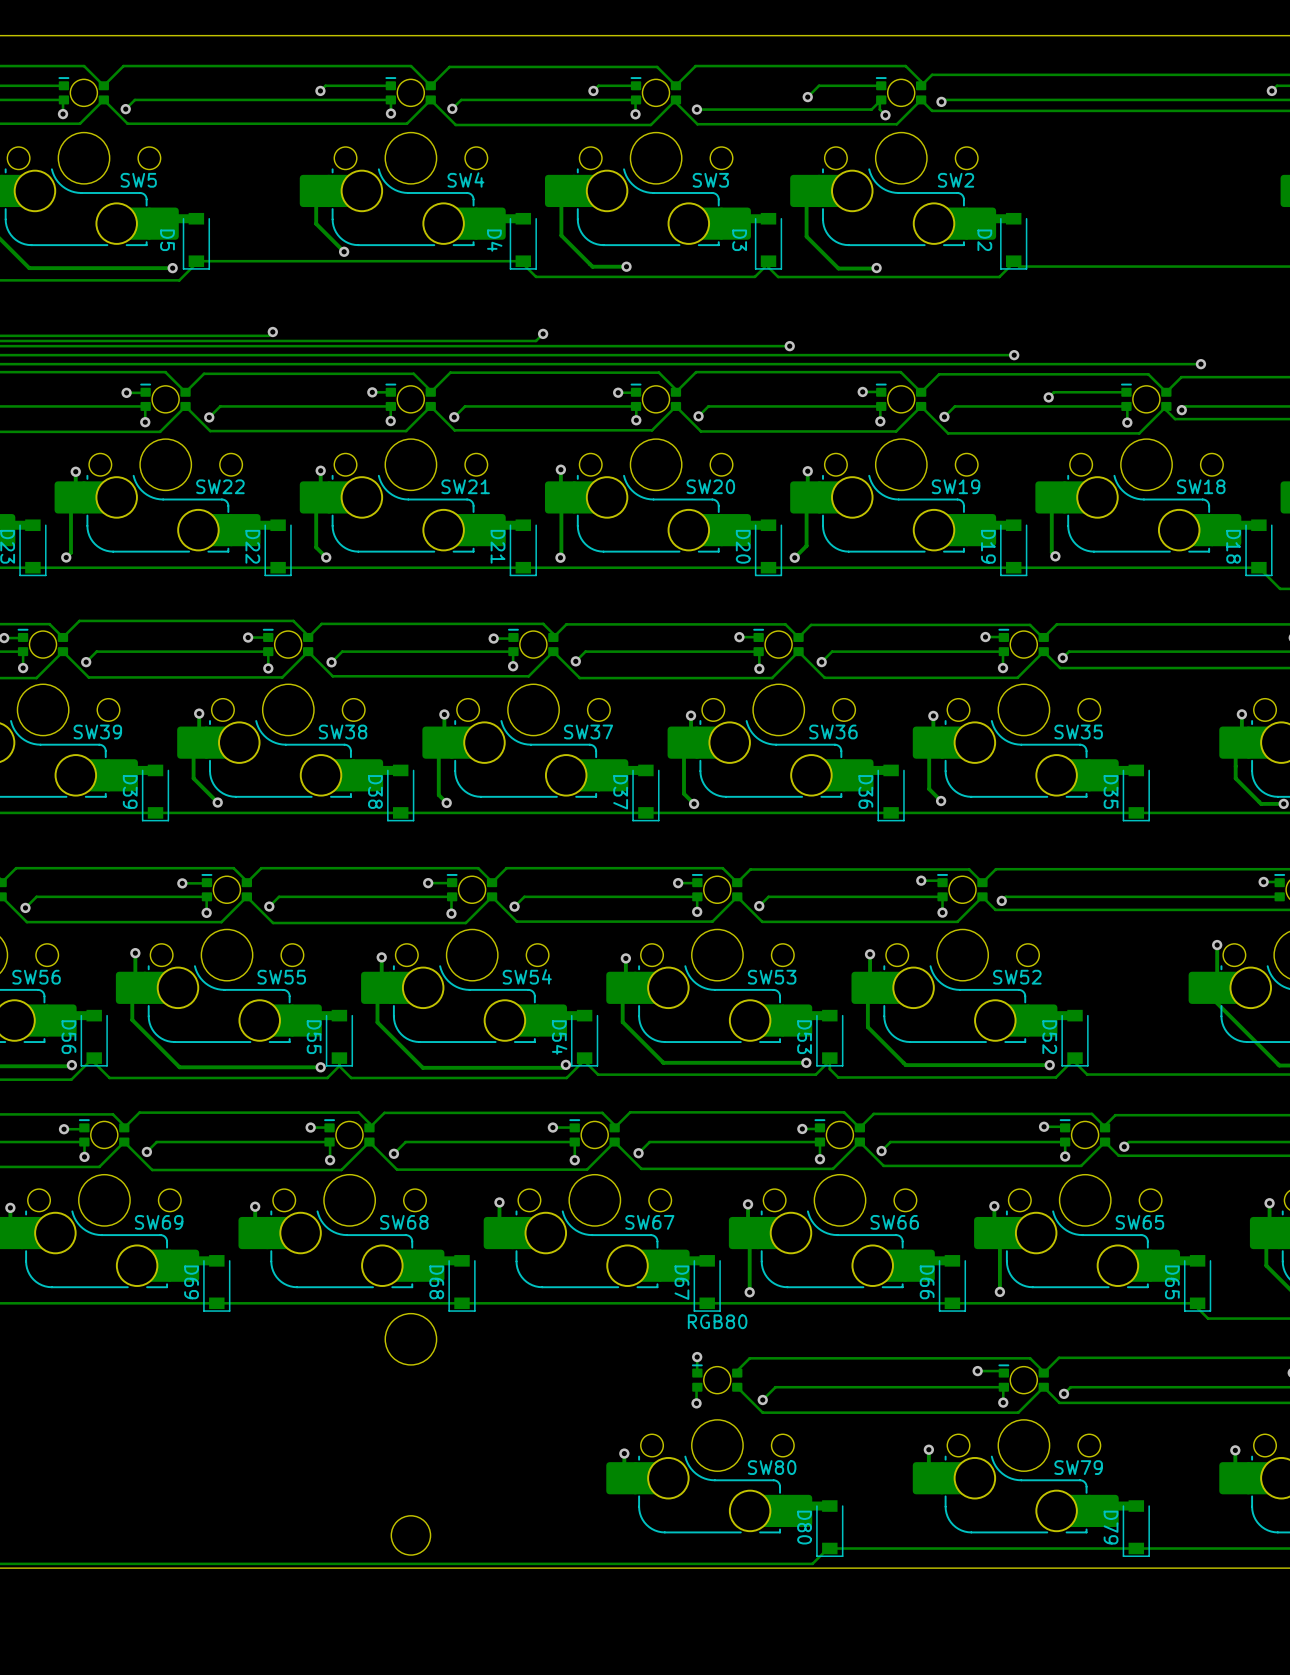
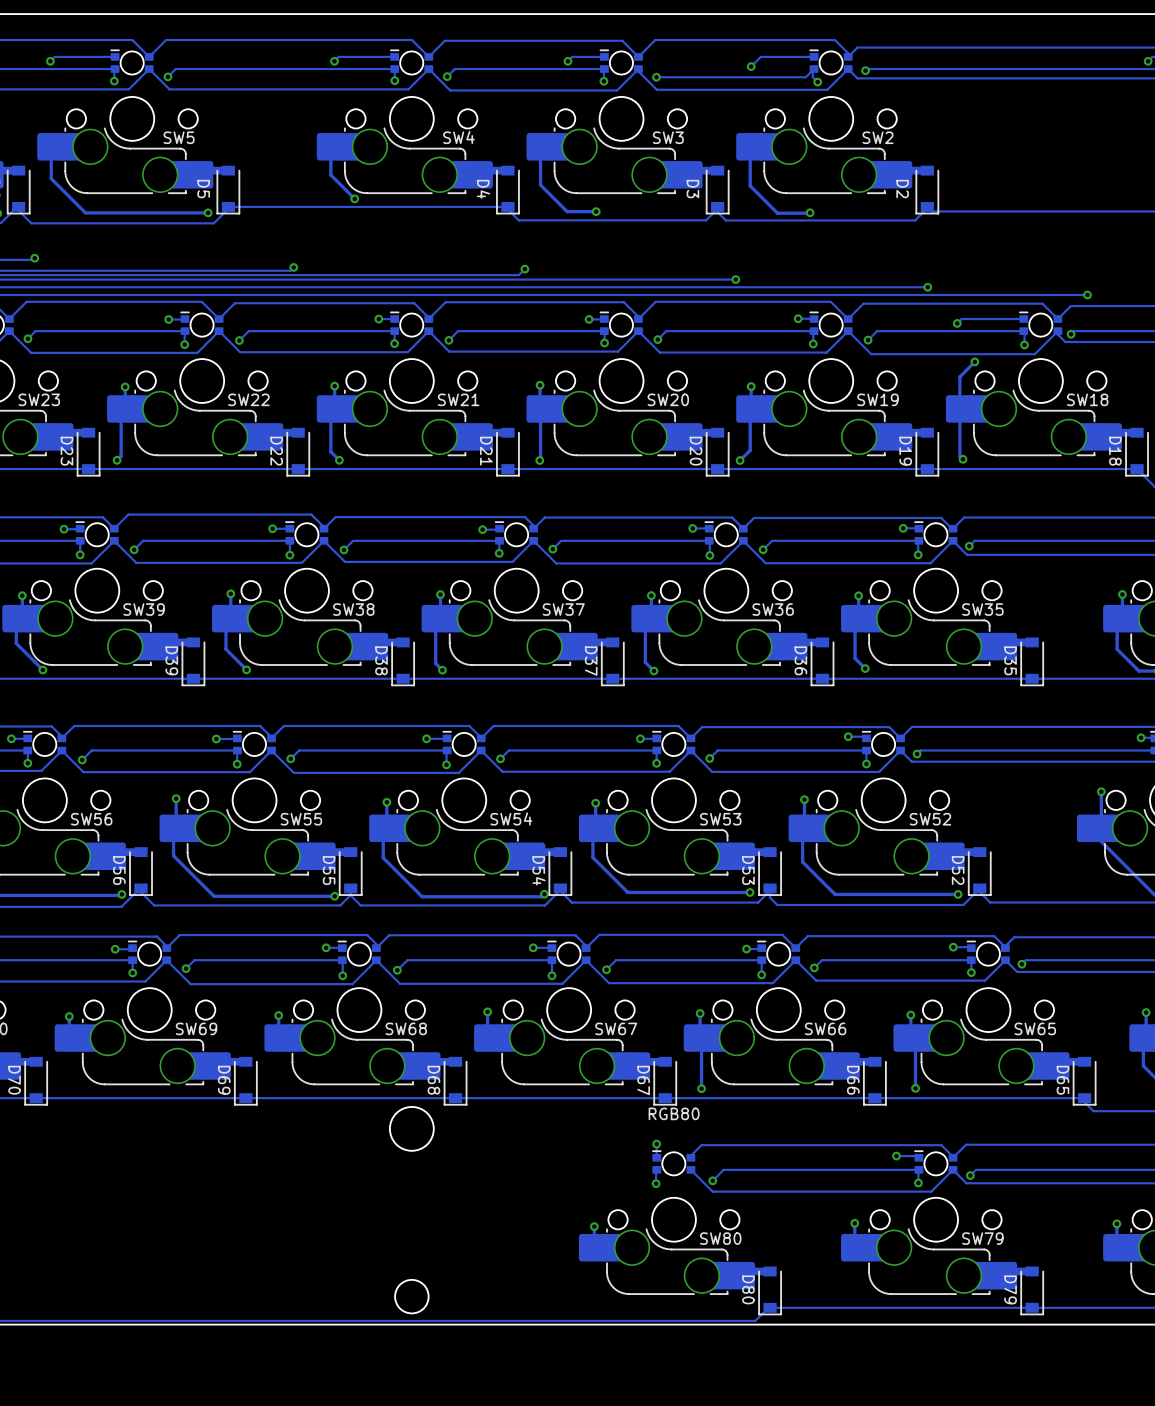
track: none -> (974, 361) (959, 376) (959, 408)
via: none -> (974, 361)

